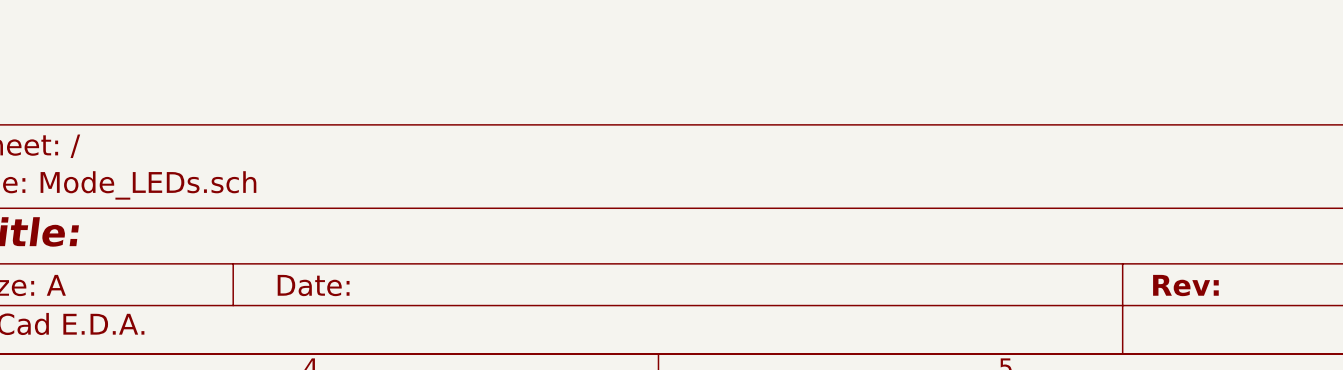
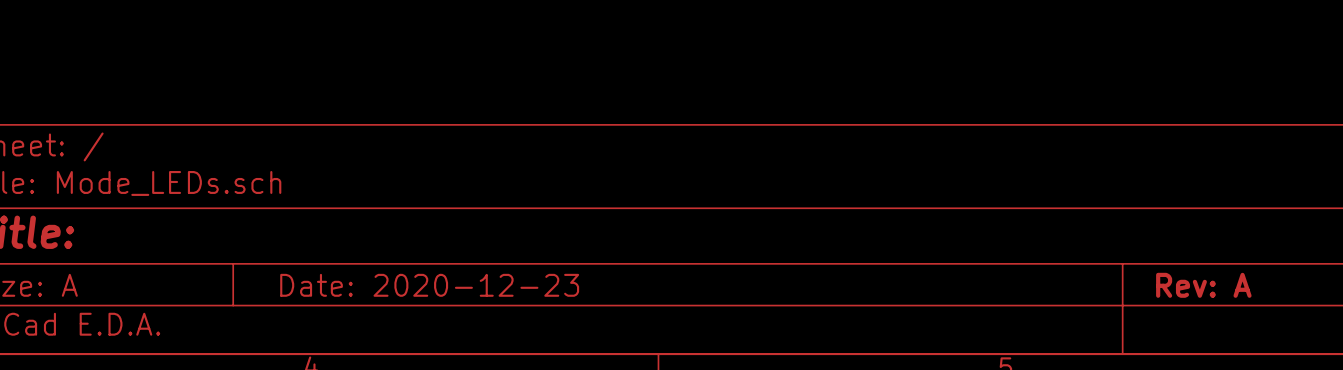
title block: Date: (313, 285) -> Date: 2020-12-23 (429, 285)
title block: Rev: (1185, 285) -> Rev: A (1203, 285)

